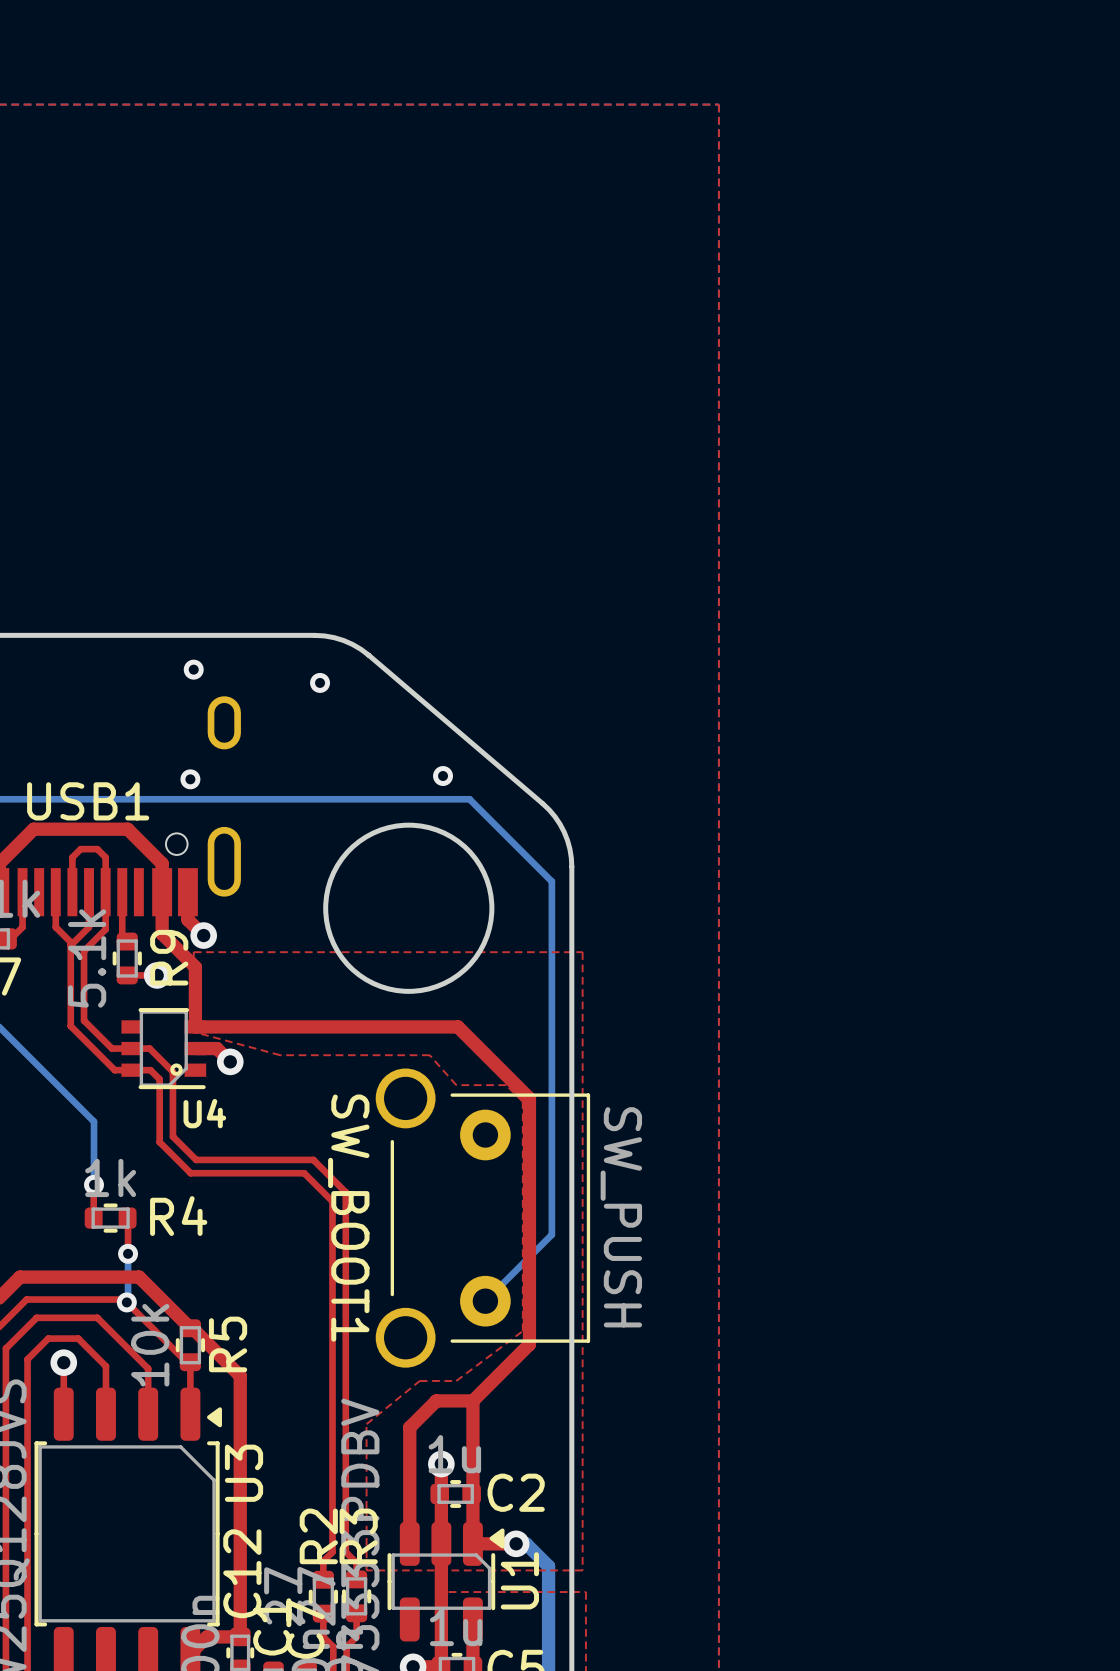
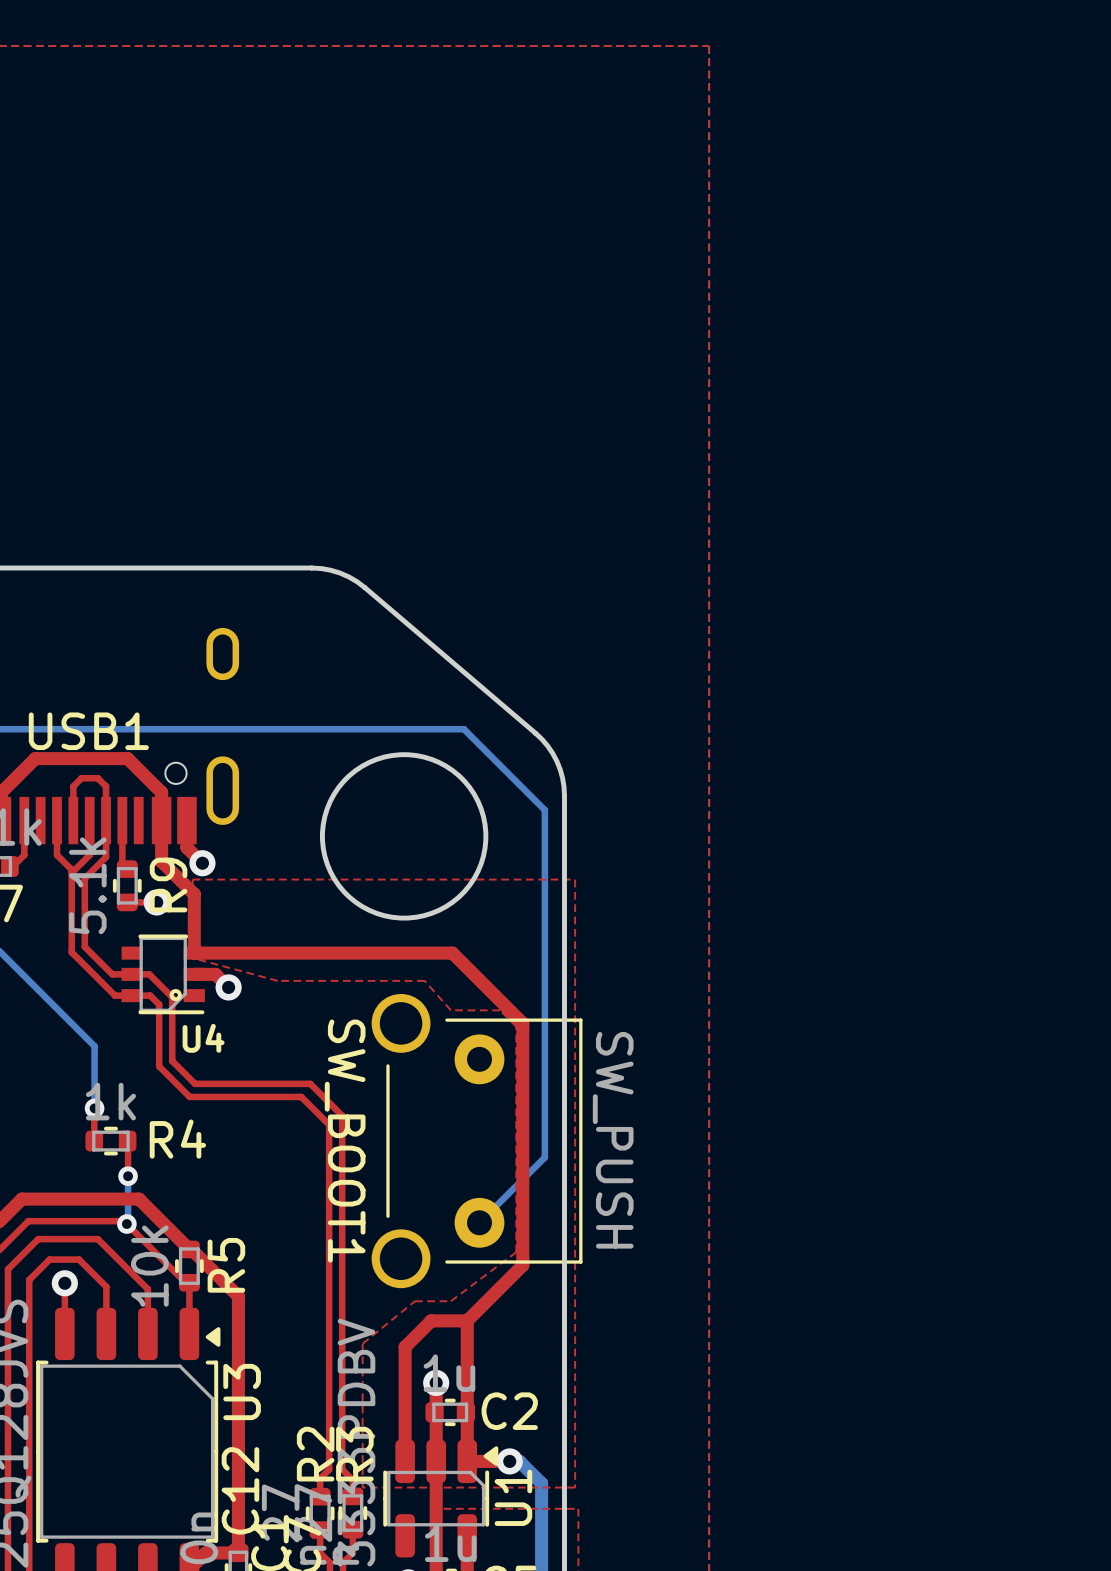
via: (193, 669) -> none
via: (320, 682) -> none
via: (443, 776) -> none
via: (190, 779) -> none

